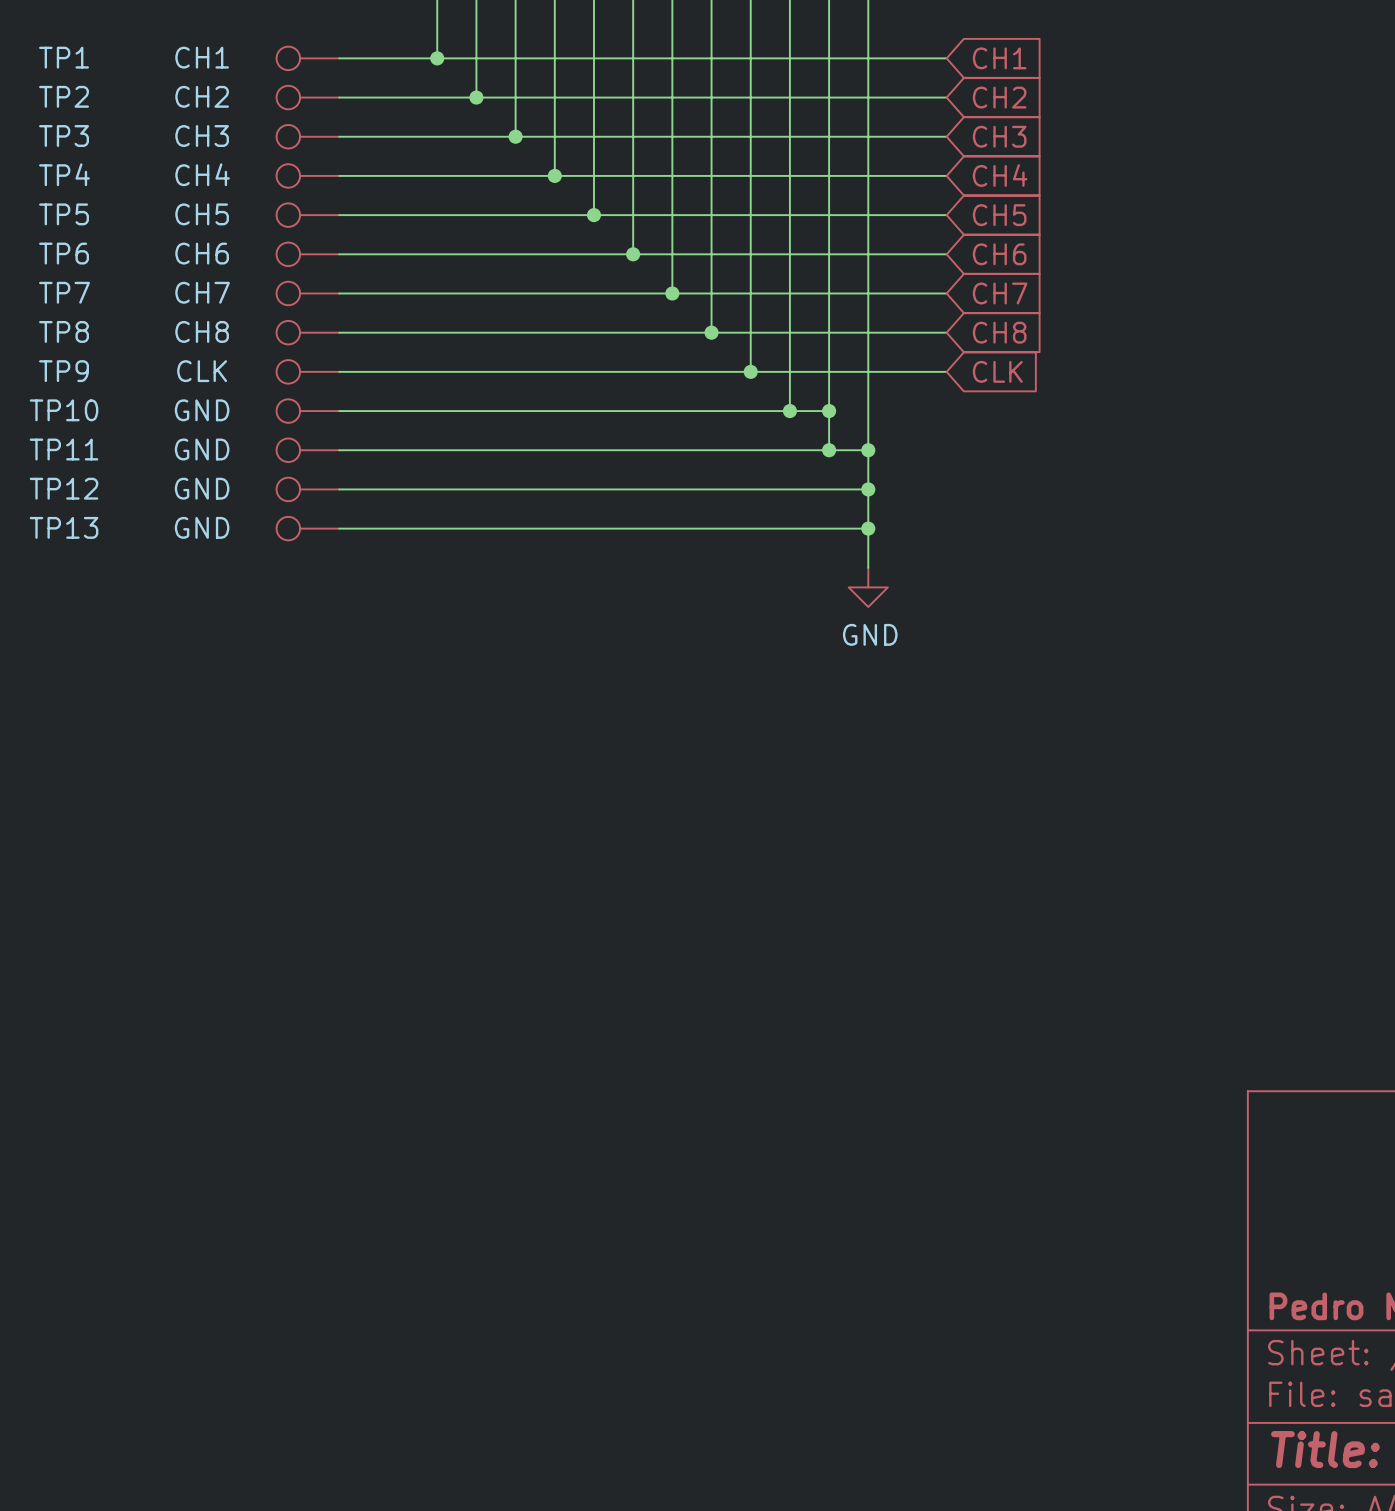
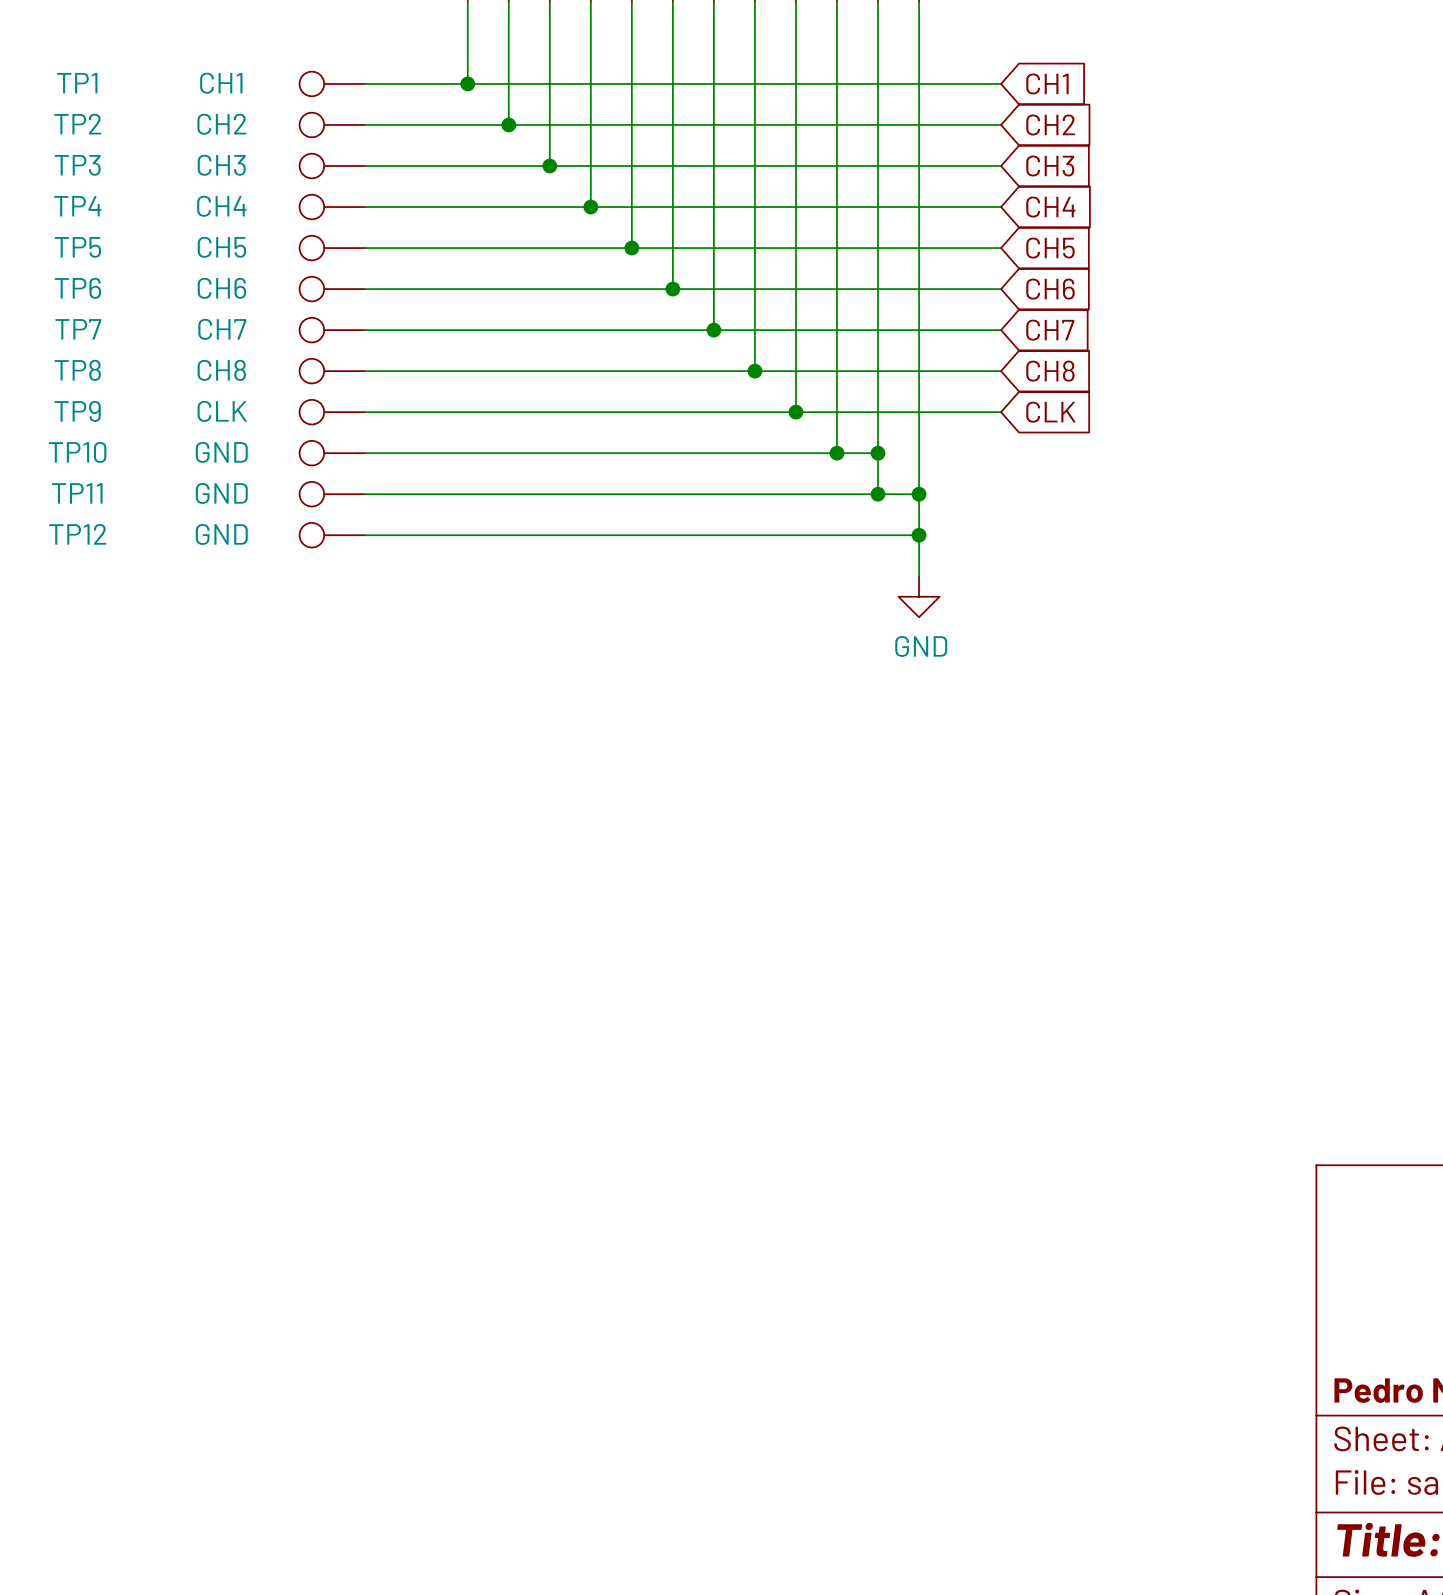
TP13: GND (307, 528) -> none
wire: (339, 528) (868, 528) (868, 567) -> none
junction: (868, 528) -> none
power symbol position: GND (868, 587) -> GND (919, 596)

